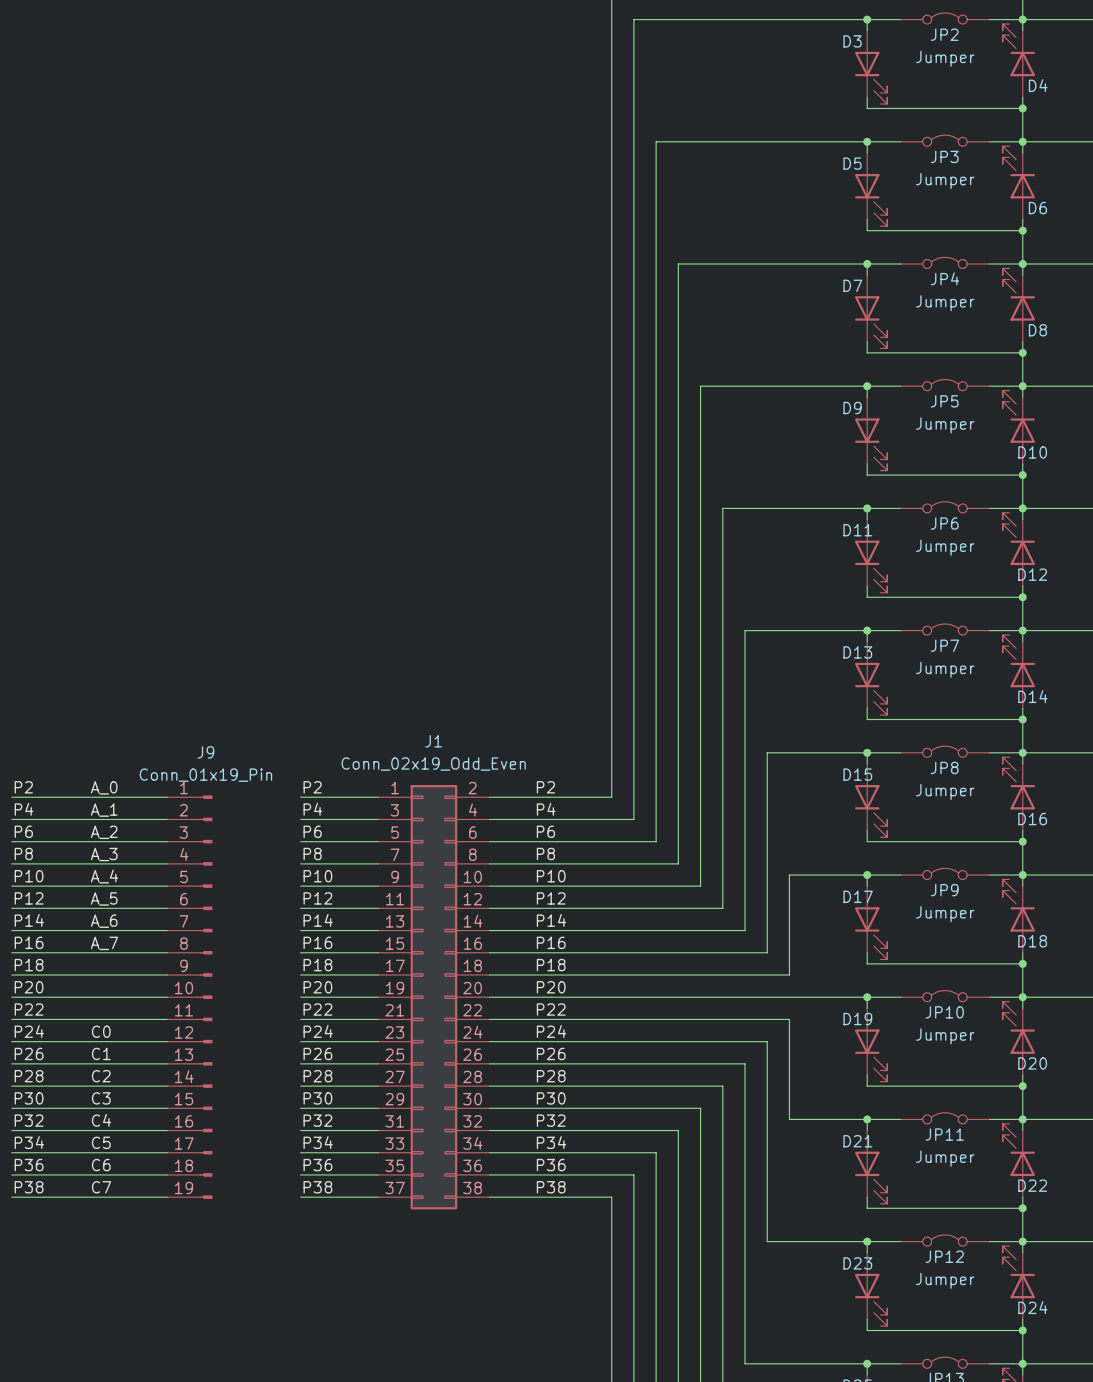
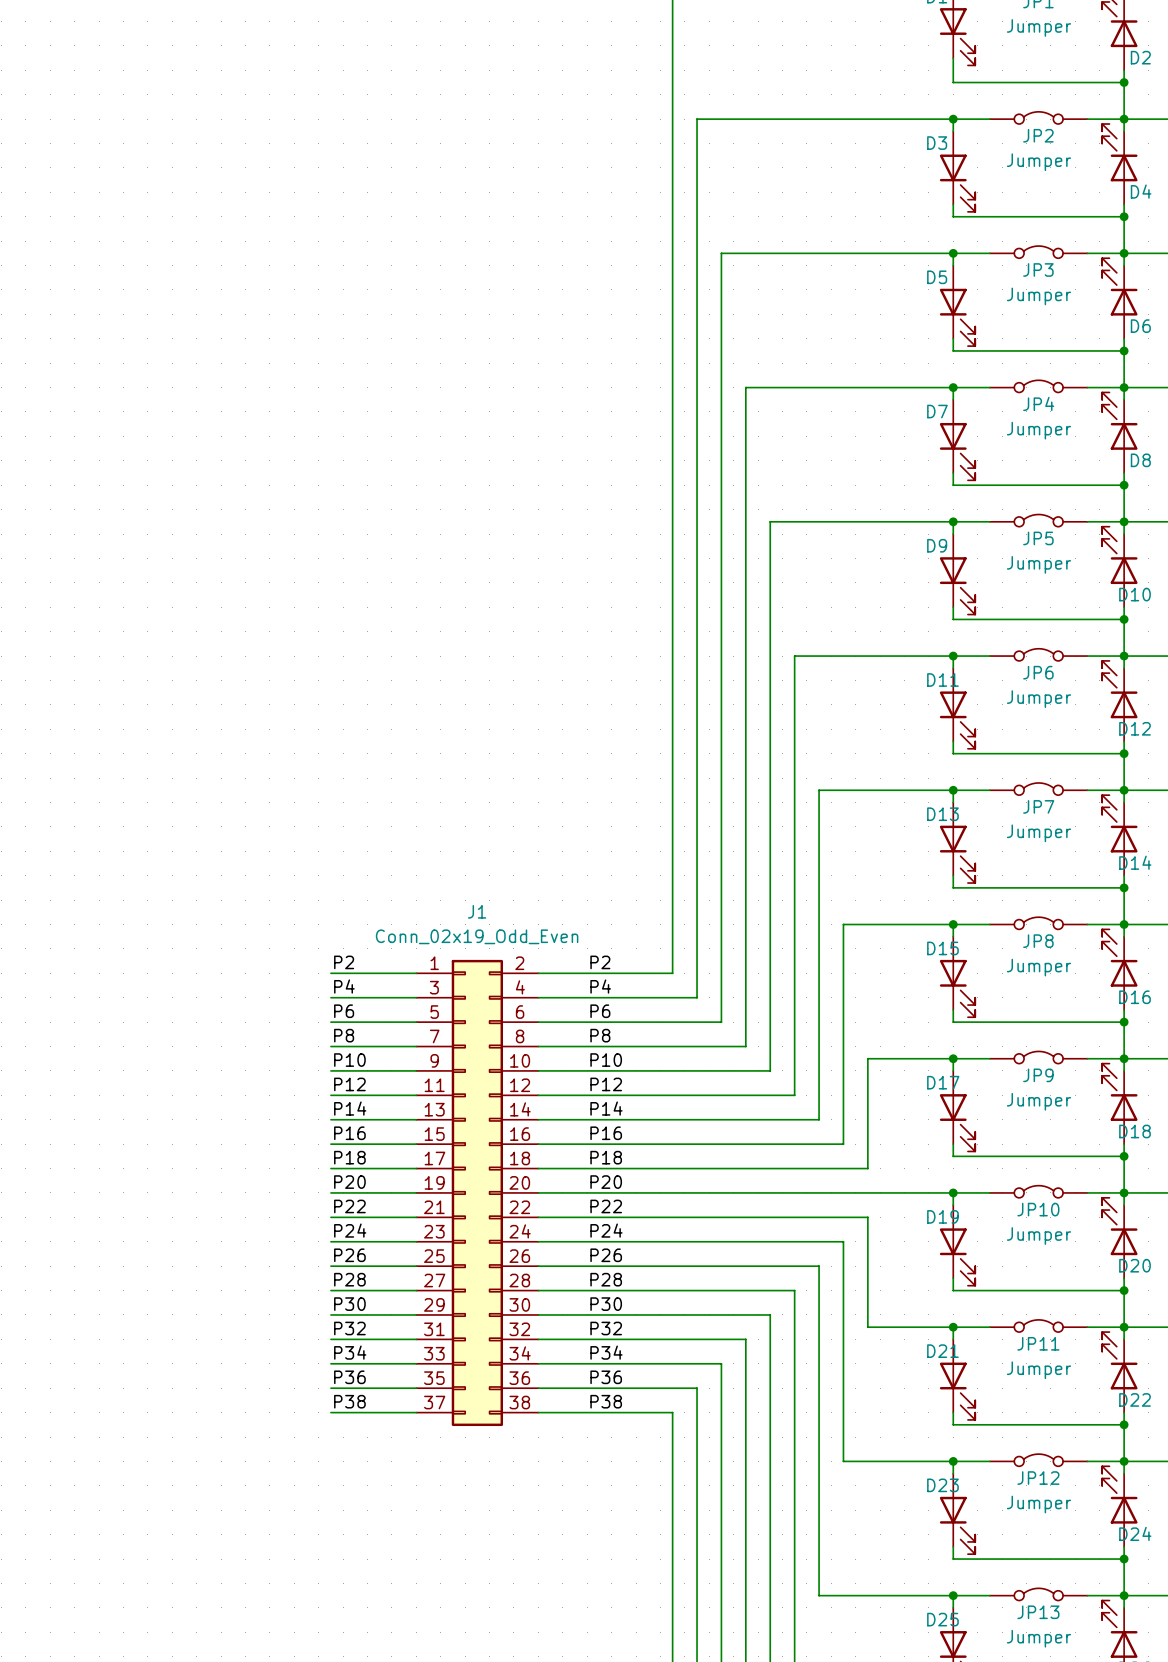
label: P2 (23, 787) -> none
label: A_0 (104, 787) -> none
wire: (11, 797) (167, 797) -> none
label: P4 (24, 809) -> none
label: A_1 (104, 810) -> none
wire: (11, 819) (167, 819) -> none
label: P6 (23, 831) -> none
label: A_2 (104, 832) -> none
wire: (11, 841) (167, 841) -> none
label: P8 (23, 853) -> none
label: A_3 (104, 854) -> none
wire: (11, 863) (167, 863) -> none
label: P10 (29, 876) -> none
label: A_4 (104, 876) -> none
wire: (11, 886) (167, 886) -> none
label: P12 (29, 898) -> none
label: A_5 (104, 898) -> none
wire: (11, 908) (167, 908) -> none
label: P14 (29, 920) -> none
label: A_6 (104, 921) -> none
wire: (11, 930) (167, 930) -> none
label: P16 (29, 942) -> none
label: A_7 (104, 943) -> none
wire: (11, 952) (167, 952) -> none
label: P18 (29, 965) -> none
wire: (11, 975) (167, 975) -> none
label: P20 (29, 987) -> none
wire: (11, 997) (167, 997) -> none
J9: Conn_01x19_Pin (189, 997) -> none
label: P22 (29, 1009) -> none
wire: (11, 1019) (167, 1019) -> none
label: P24 (29, 1031) -> none
label: C0 (101, 1031) -> none
wire: (11, 1041) (167, 1041) -> none
label: P26 (29, 1053) -> none
label: C1 (101, 1053) -> none
wire: (11, 1063) (167, 1063) -> none
label: P28 (29, 1076) -> none
label: C2 (101, 1076) -> none
wire: (11, 1086) (167, 1086) -> none
label: P30 (29, 1098) -> none
label: C3 (101, 1098) -> none
wire: (11, 1108) (167, 1108) -> none
label: P32 (29, 1120) -> none
label: C4 (101, 1120) -> none
wire: (11, 1130) (167, 1130) -> none
label: P34 (29, 1142) -> none
label: C5 (101, 1142) -> none
wire: (11, 1152) (167, 1152) -> none
label: P36 (29, 1165) -> none
label: C6 (101, 1165) -> none
wire: (11, 1174) (167, 1174) -> none
label: P38 (29, 1187) -> none
label: C7 (101, 1187) -> none
wire: (11, 1197) (167, 1197) -> none

